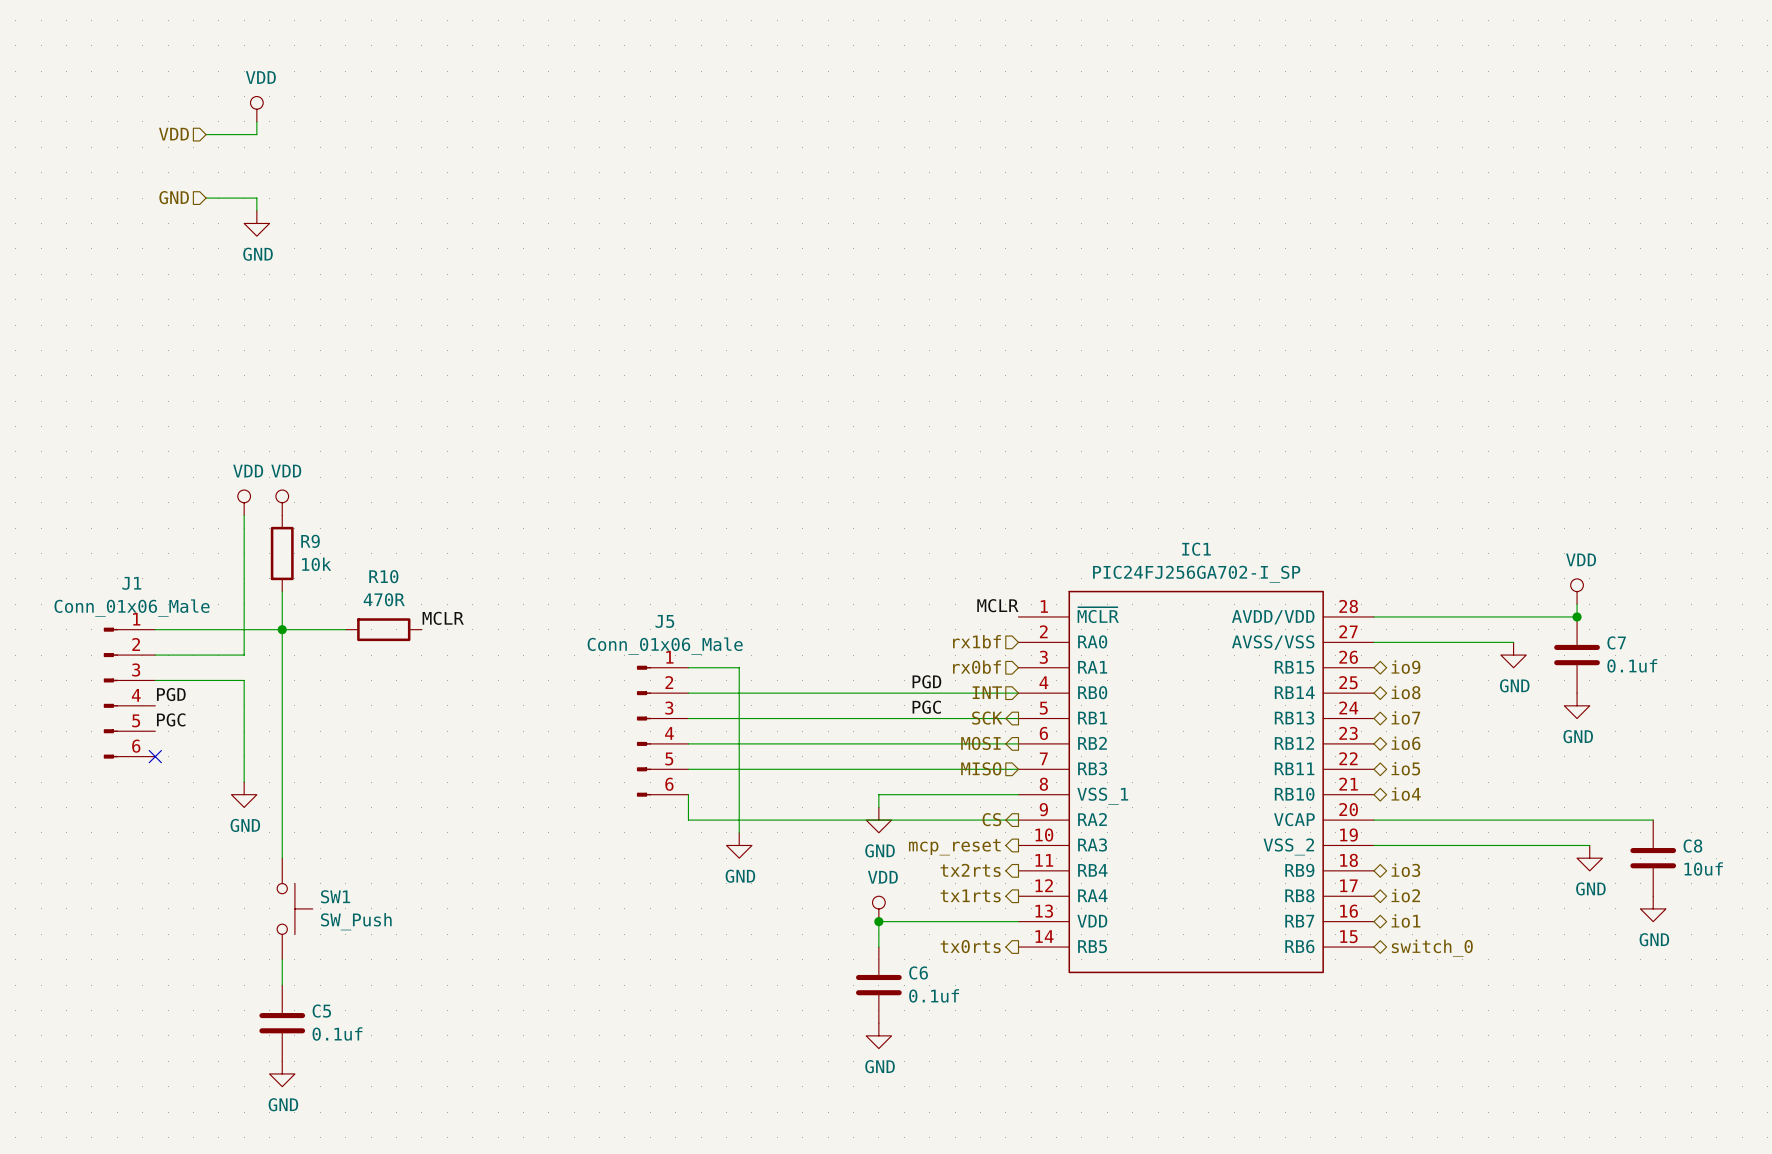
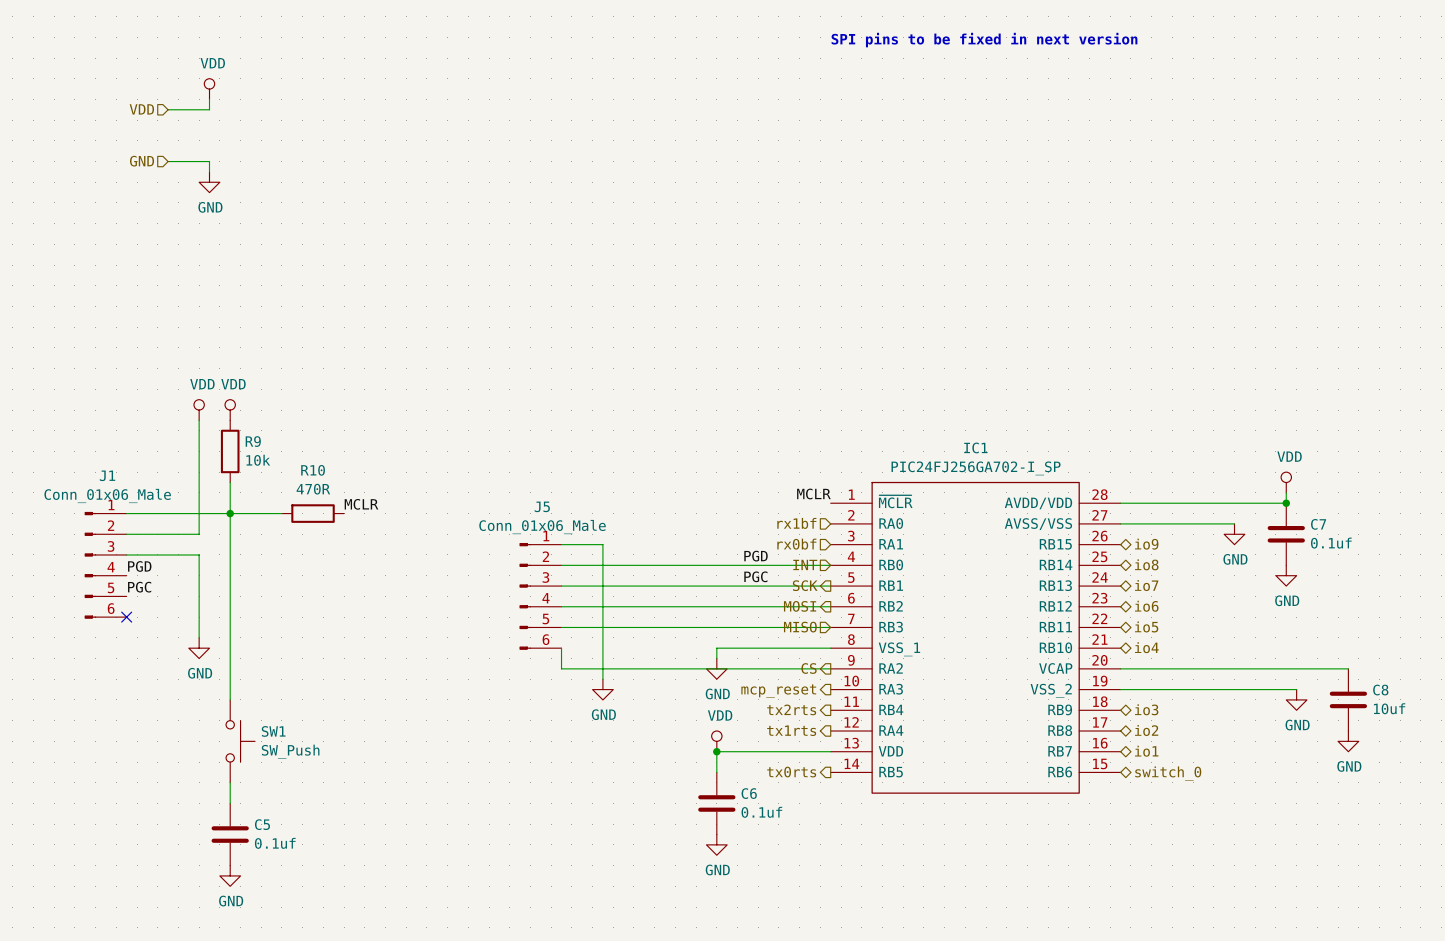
text: none -> SPI pins to be fixed in next version (984, 40)

